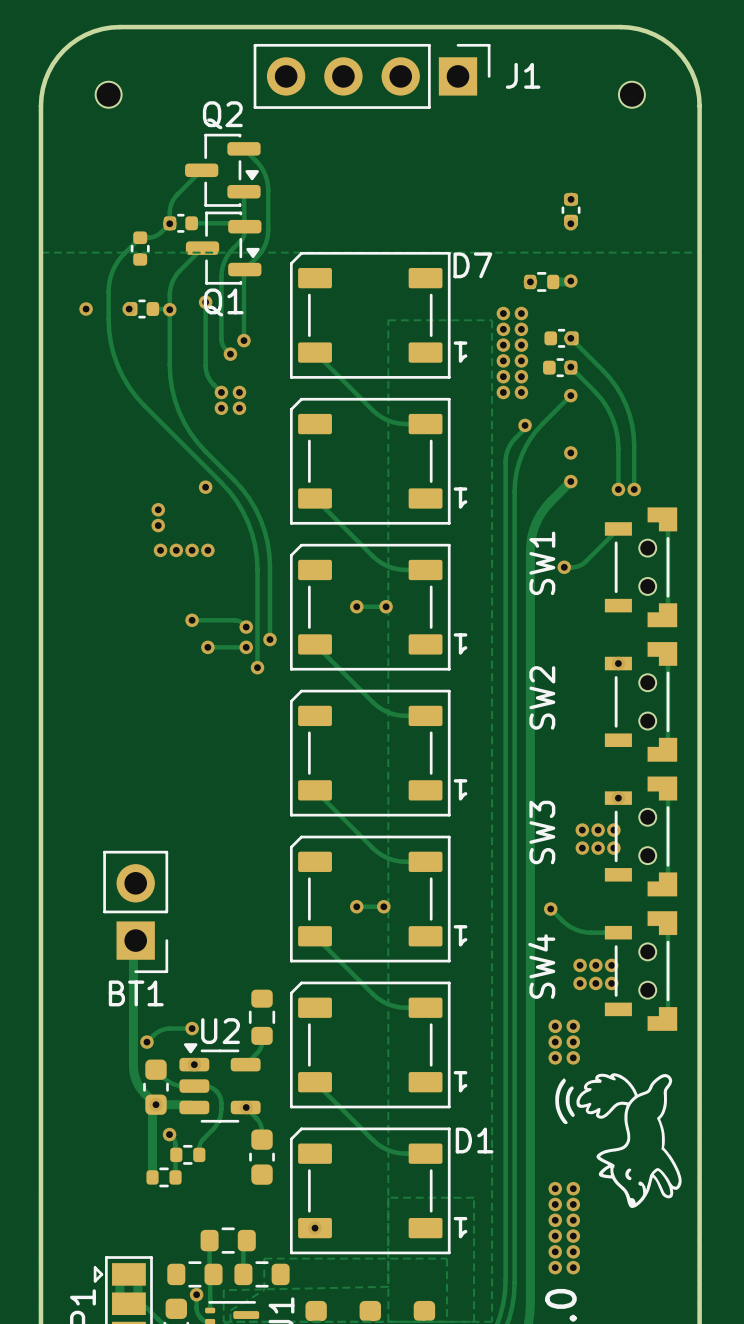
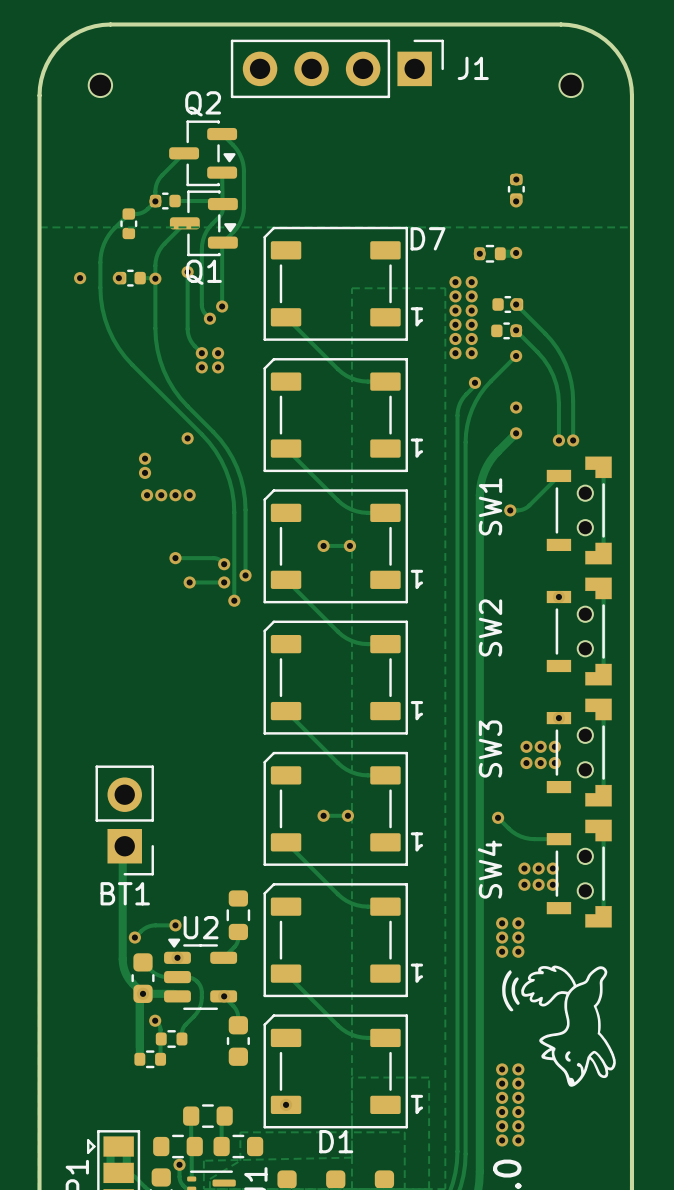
D1 name position: D1 (474, 1140) -> D1 (336, 1141)

